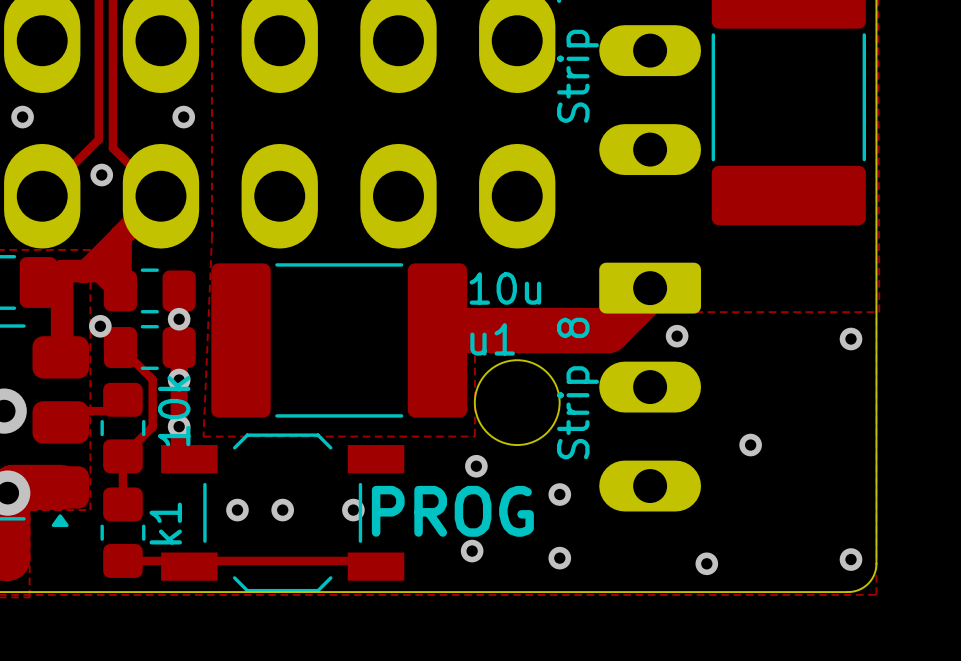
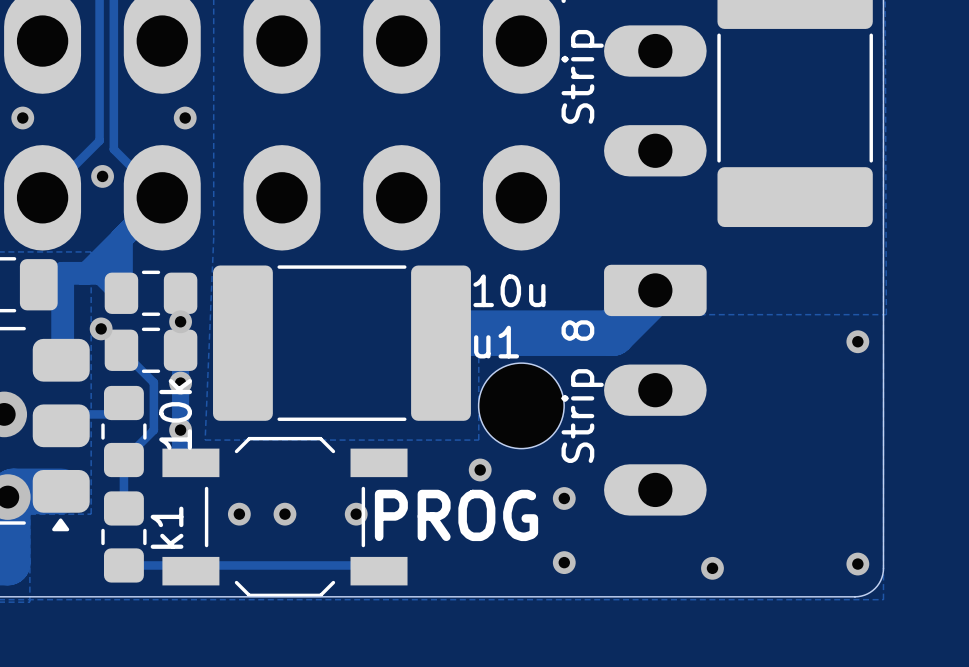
via: (677, 336) -> none
via: (750, 445) -> none
via: (472, 551) -> none

